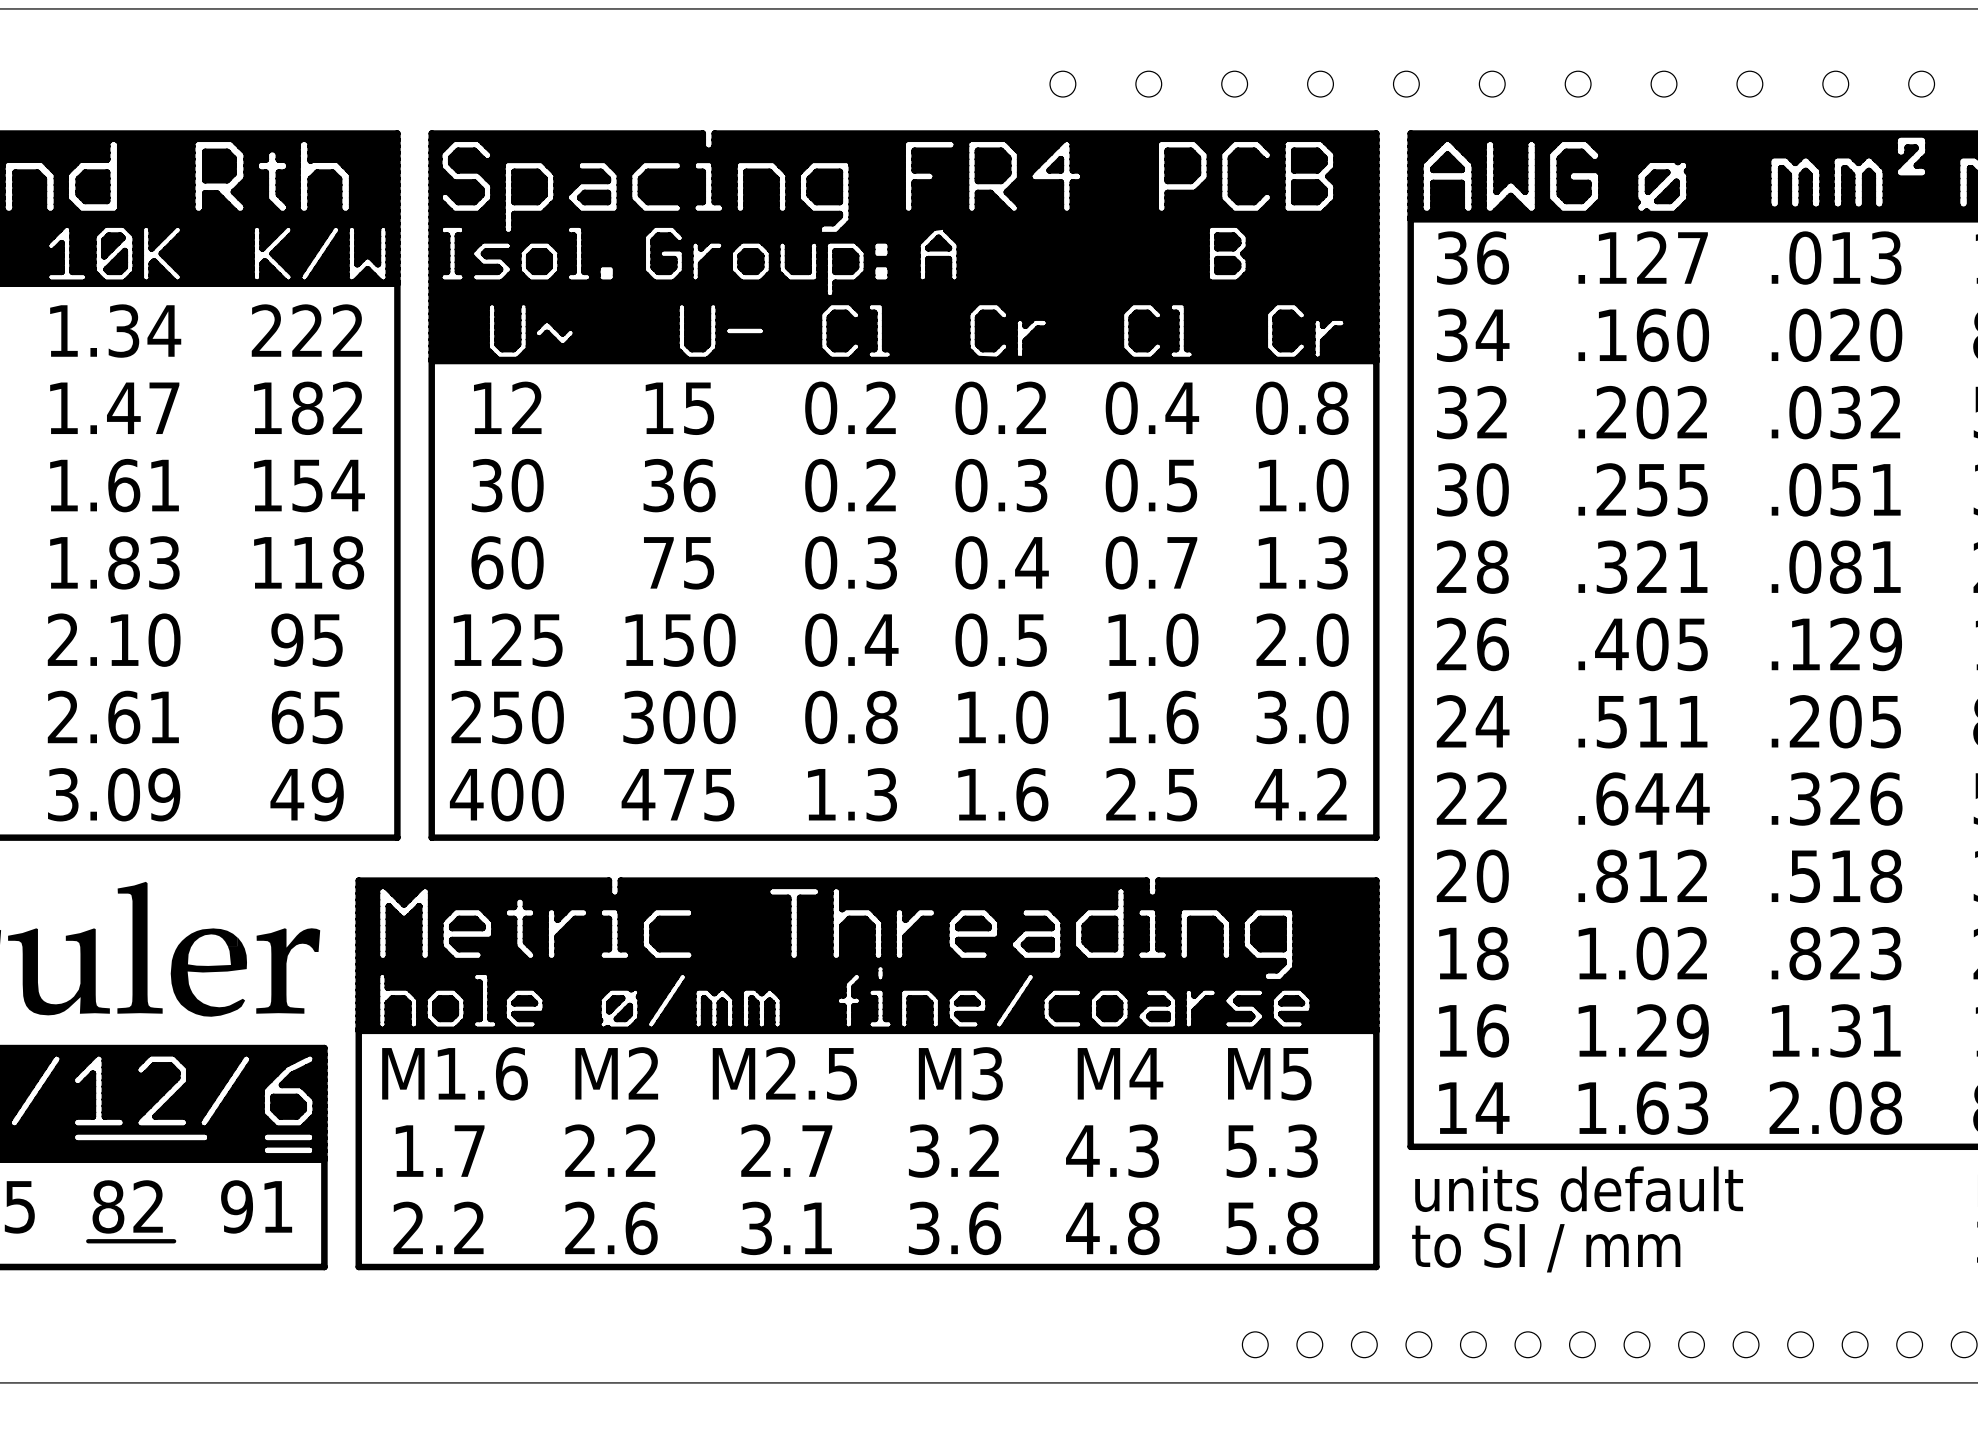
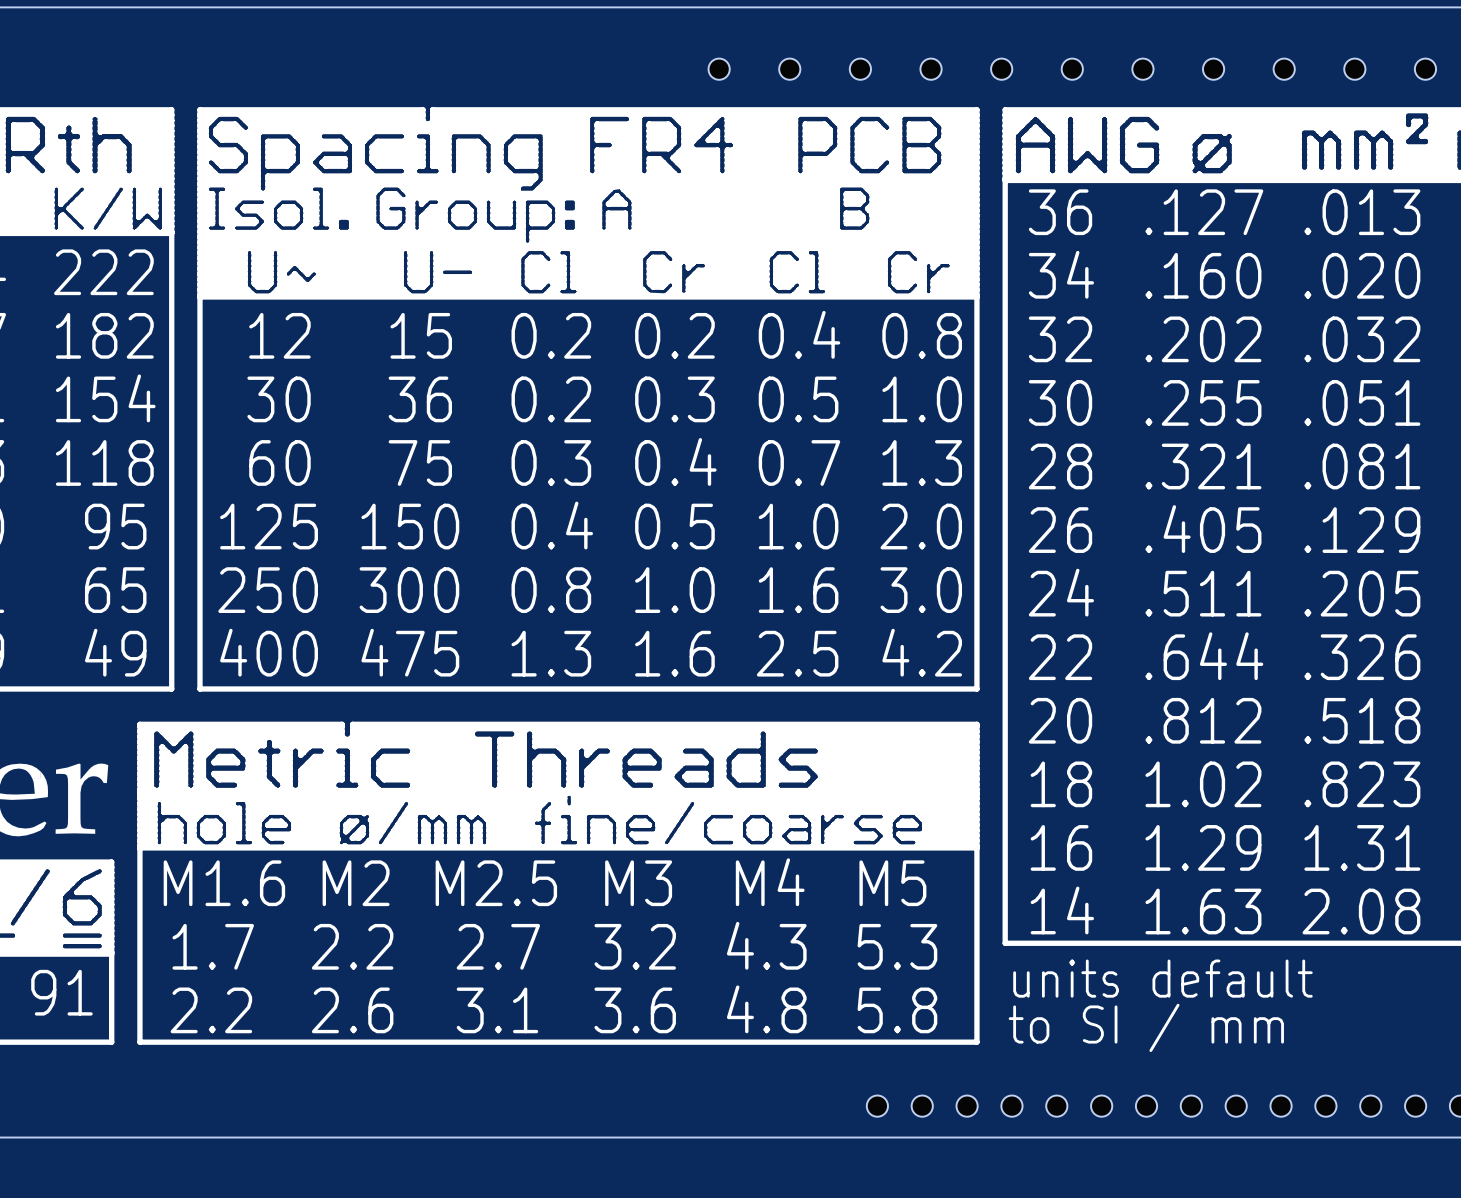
drawing shape: [355, 877, 1380, 1271] -> [137, 721, 980, 1045]

